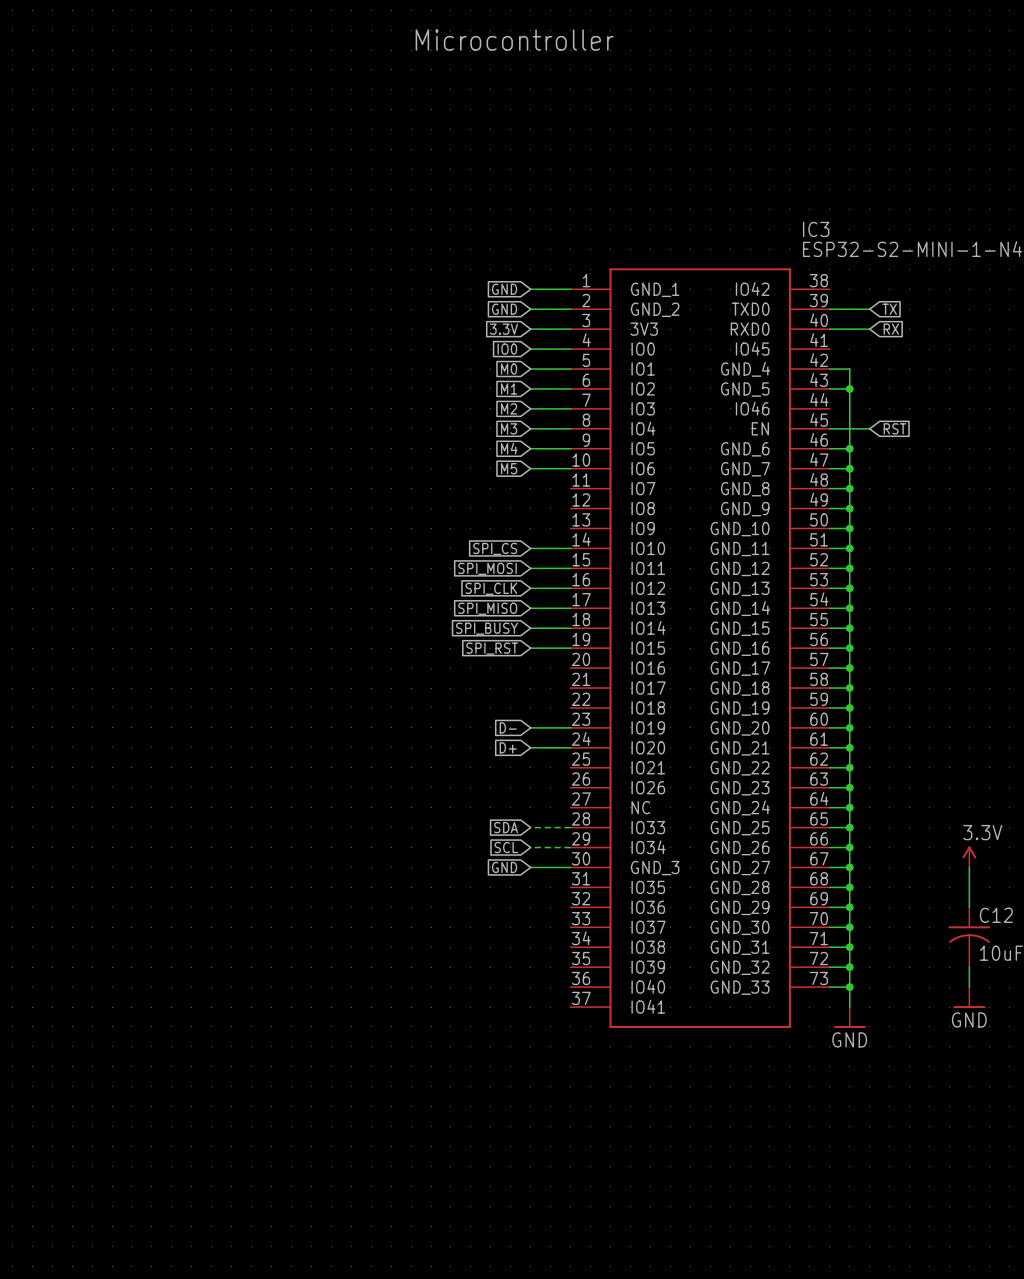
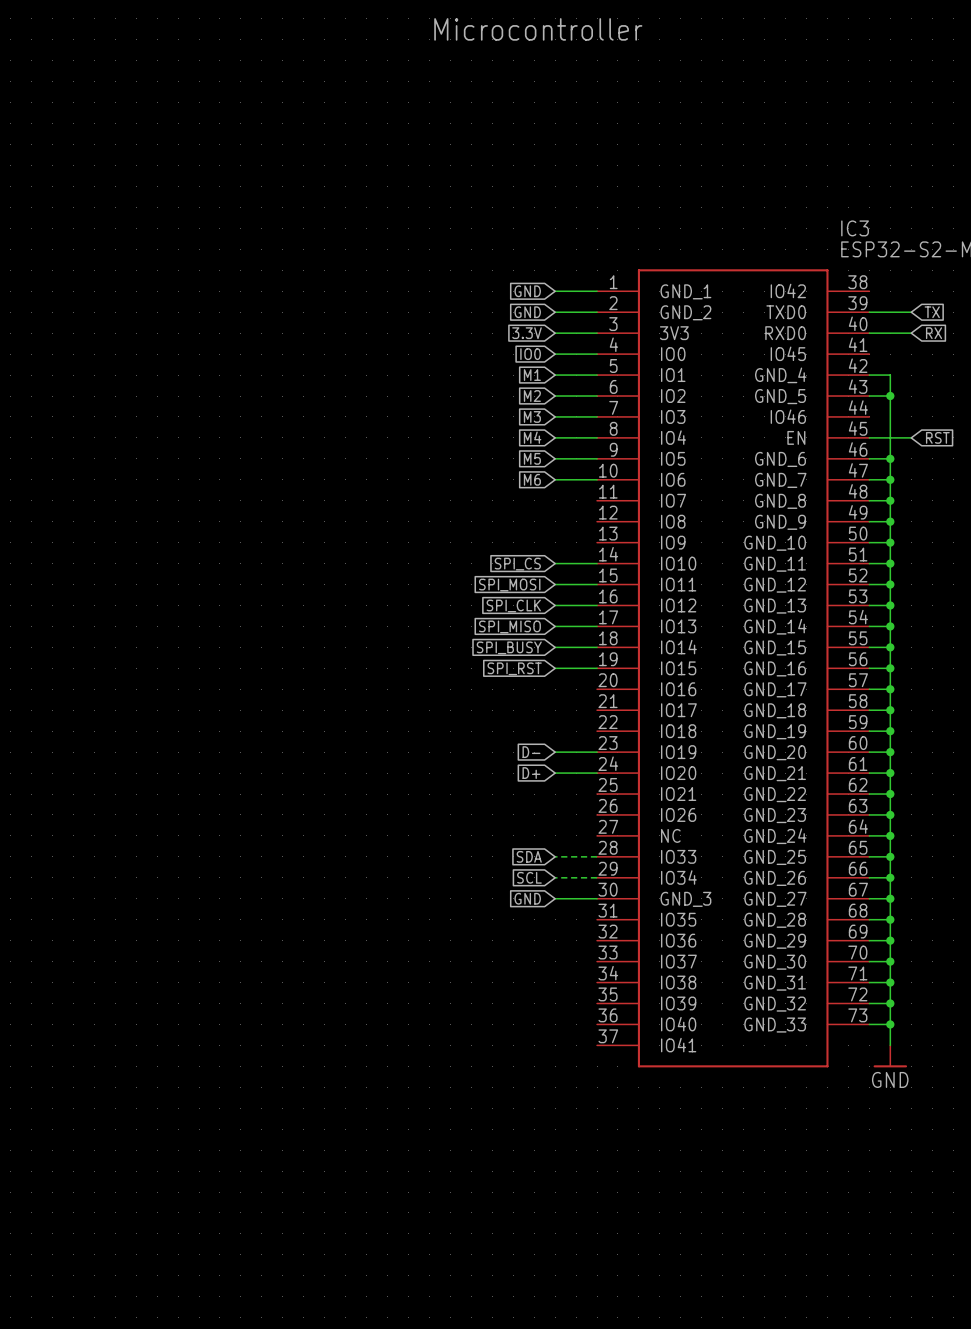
global label: M0 (509, 369) -> M1 (532, 375)
global label: M1 (509, 388) -> M2 (532, 396)
global label: M2 (509, 408) -> M3 (532, 416)
global label: M3 (509, 428) -> M4 (532, 437)
global label: M4 (509, 448) -> M5 (532, 458)
global label: M5 (509, 468) -> M6 (532, 479)

